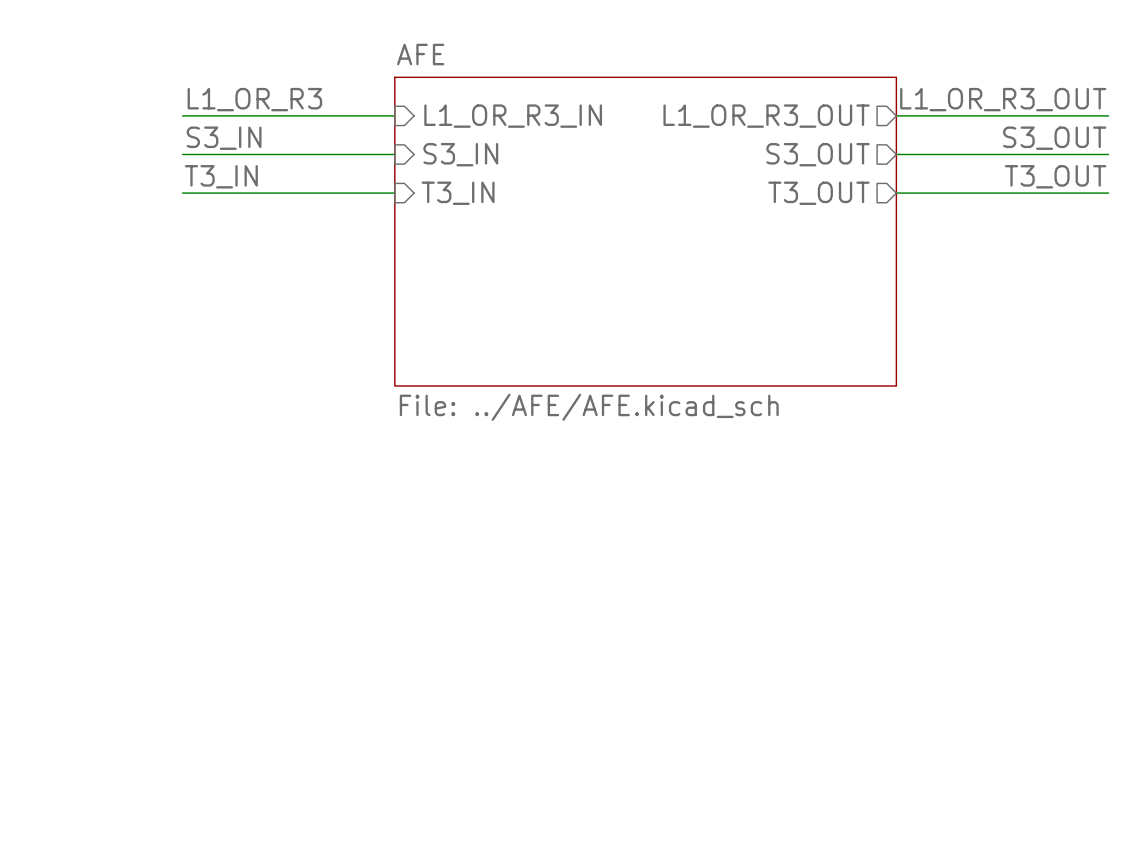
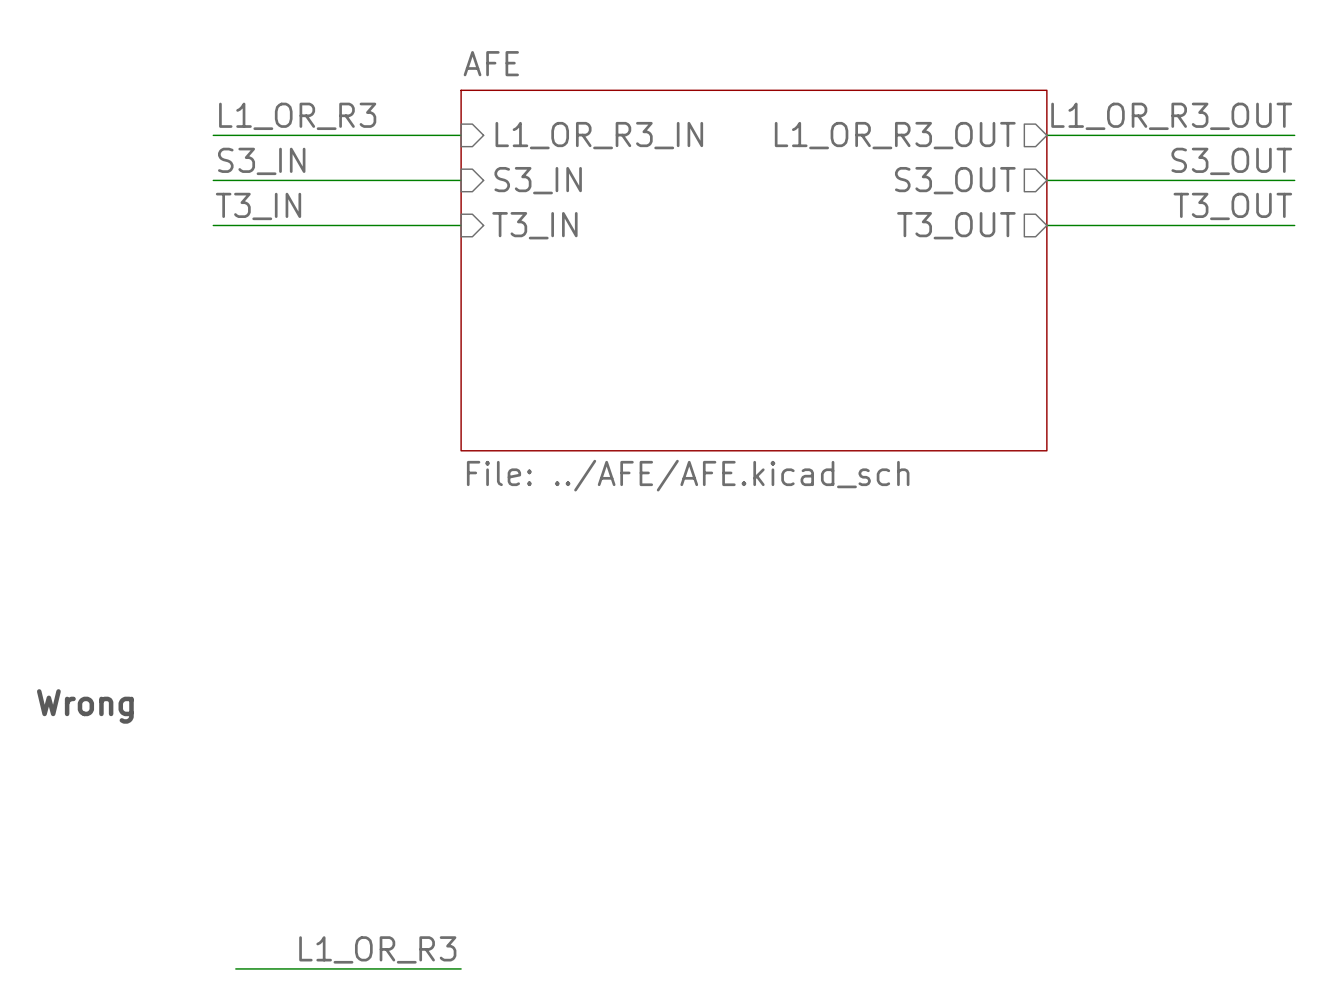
text: none -> Wrong (85, 706)
label: none -> L1_OR_R3 (377, 949)
wire: none -> (235, 968) (461, 968)

